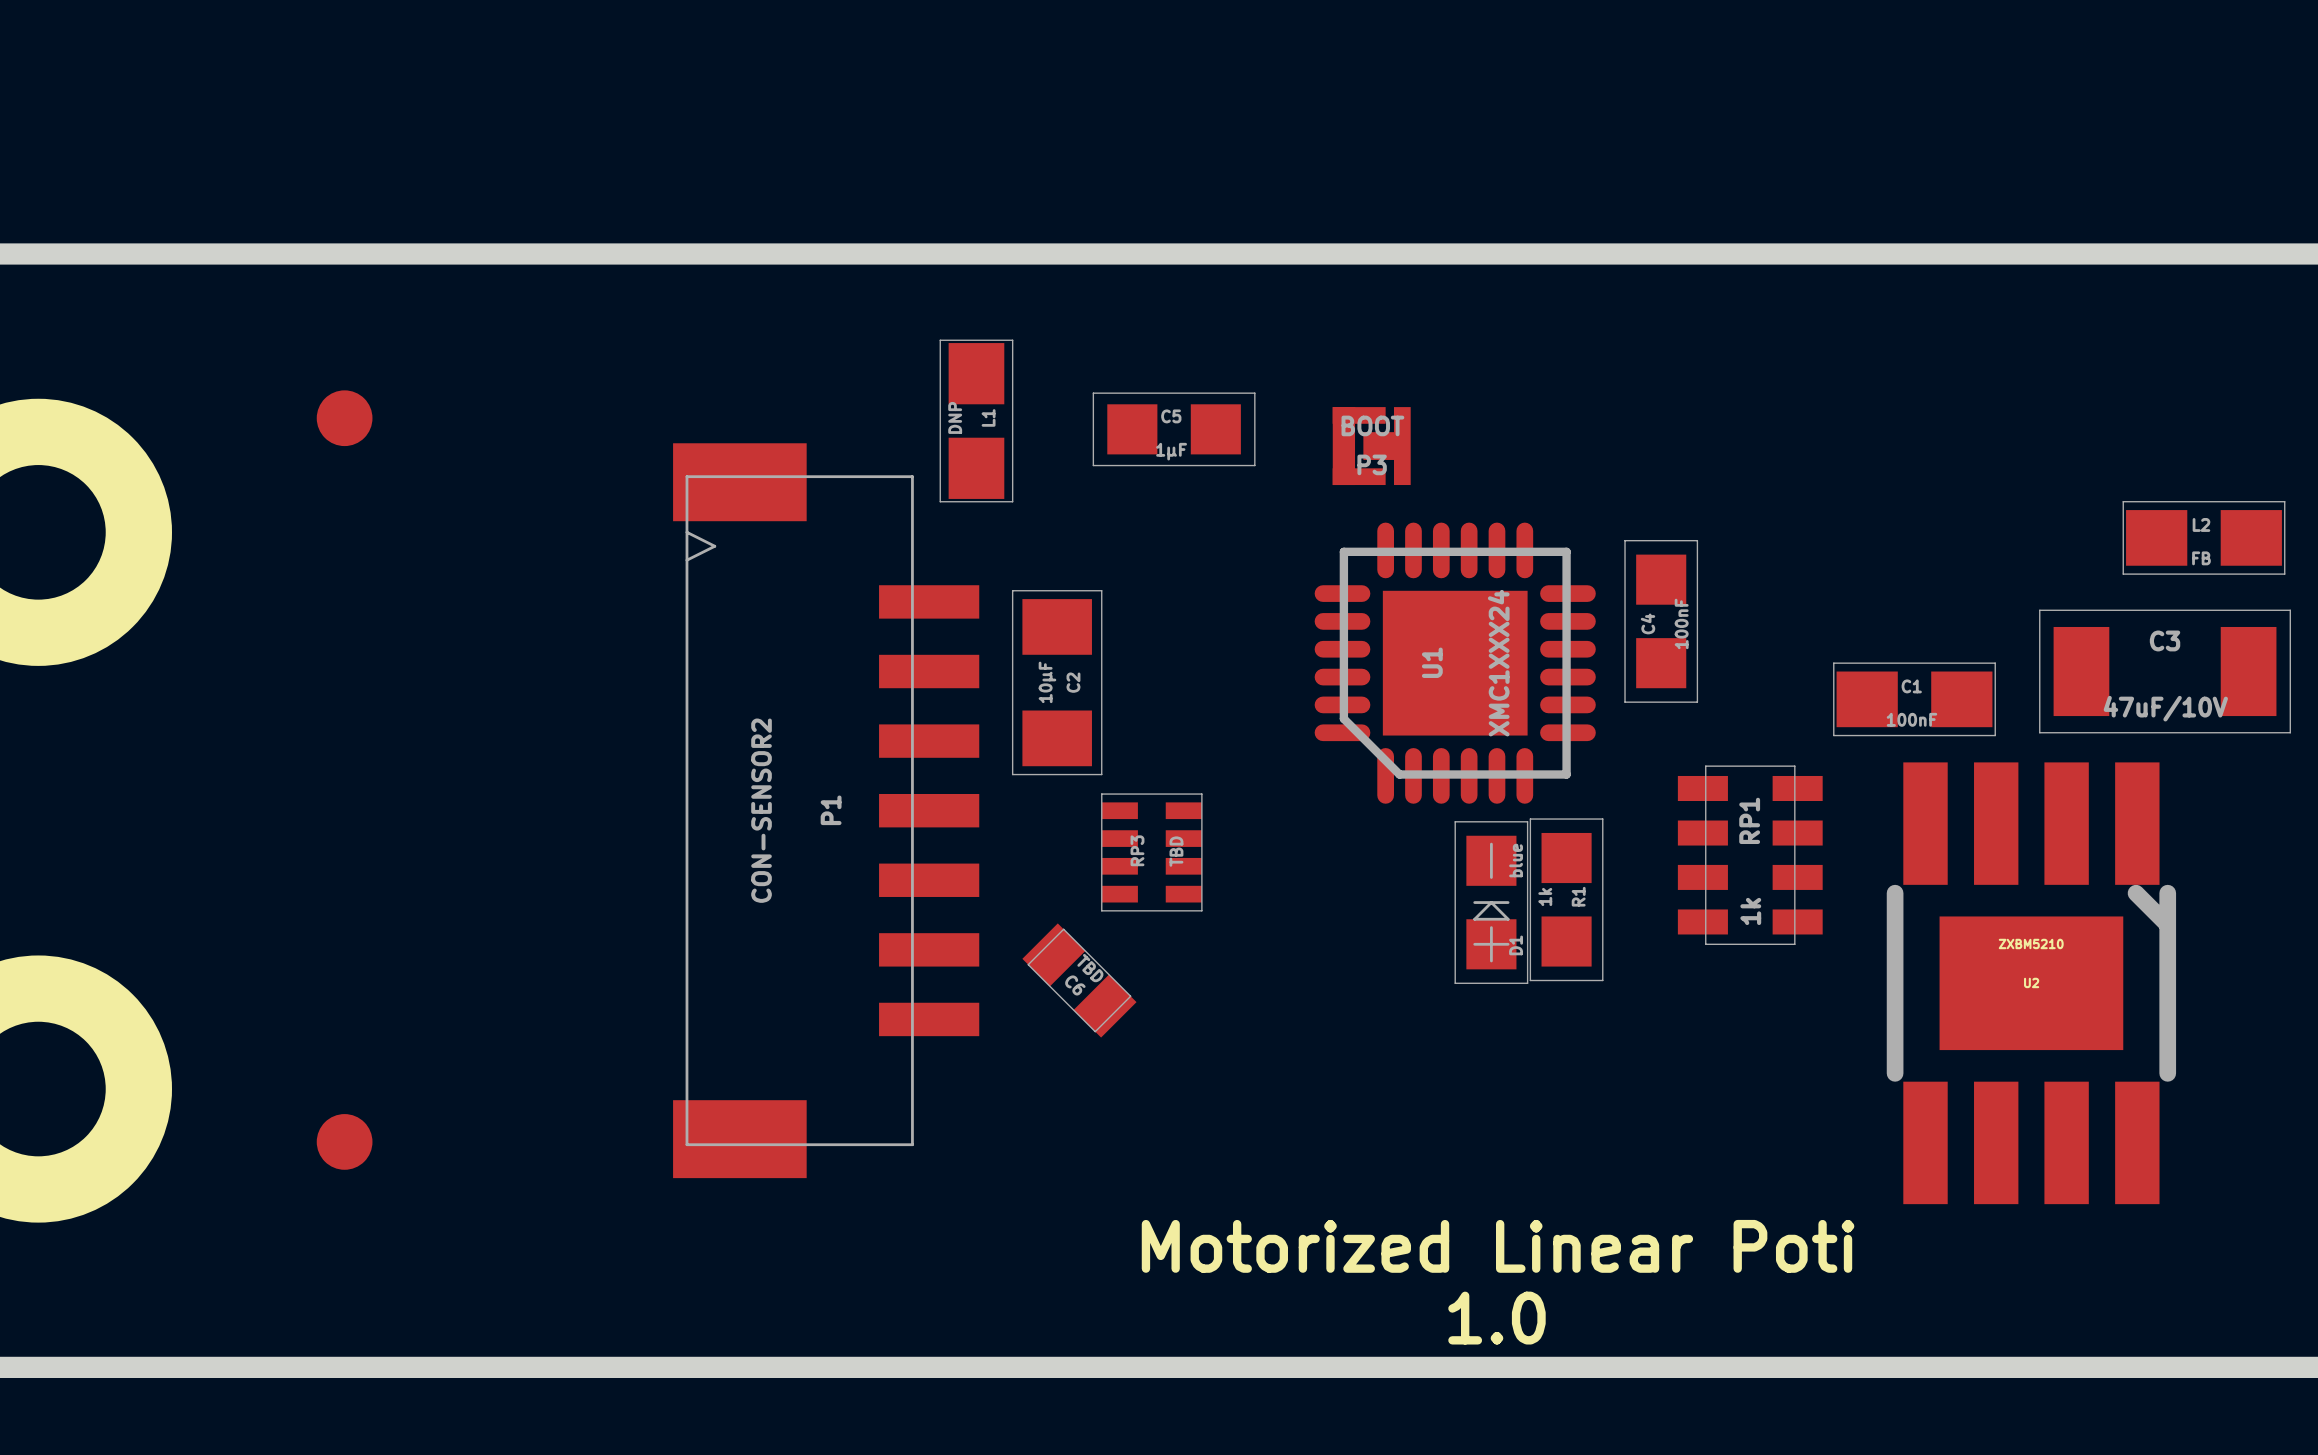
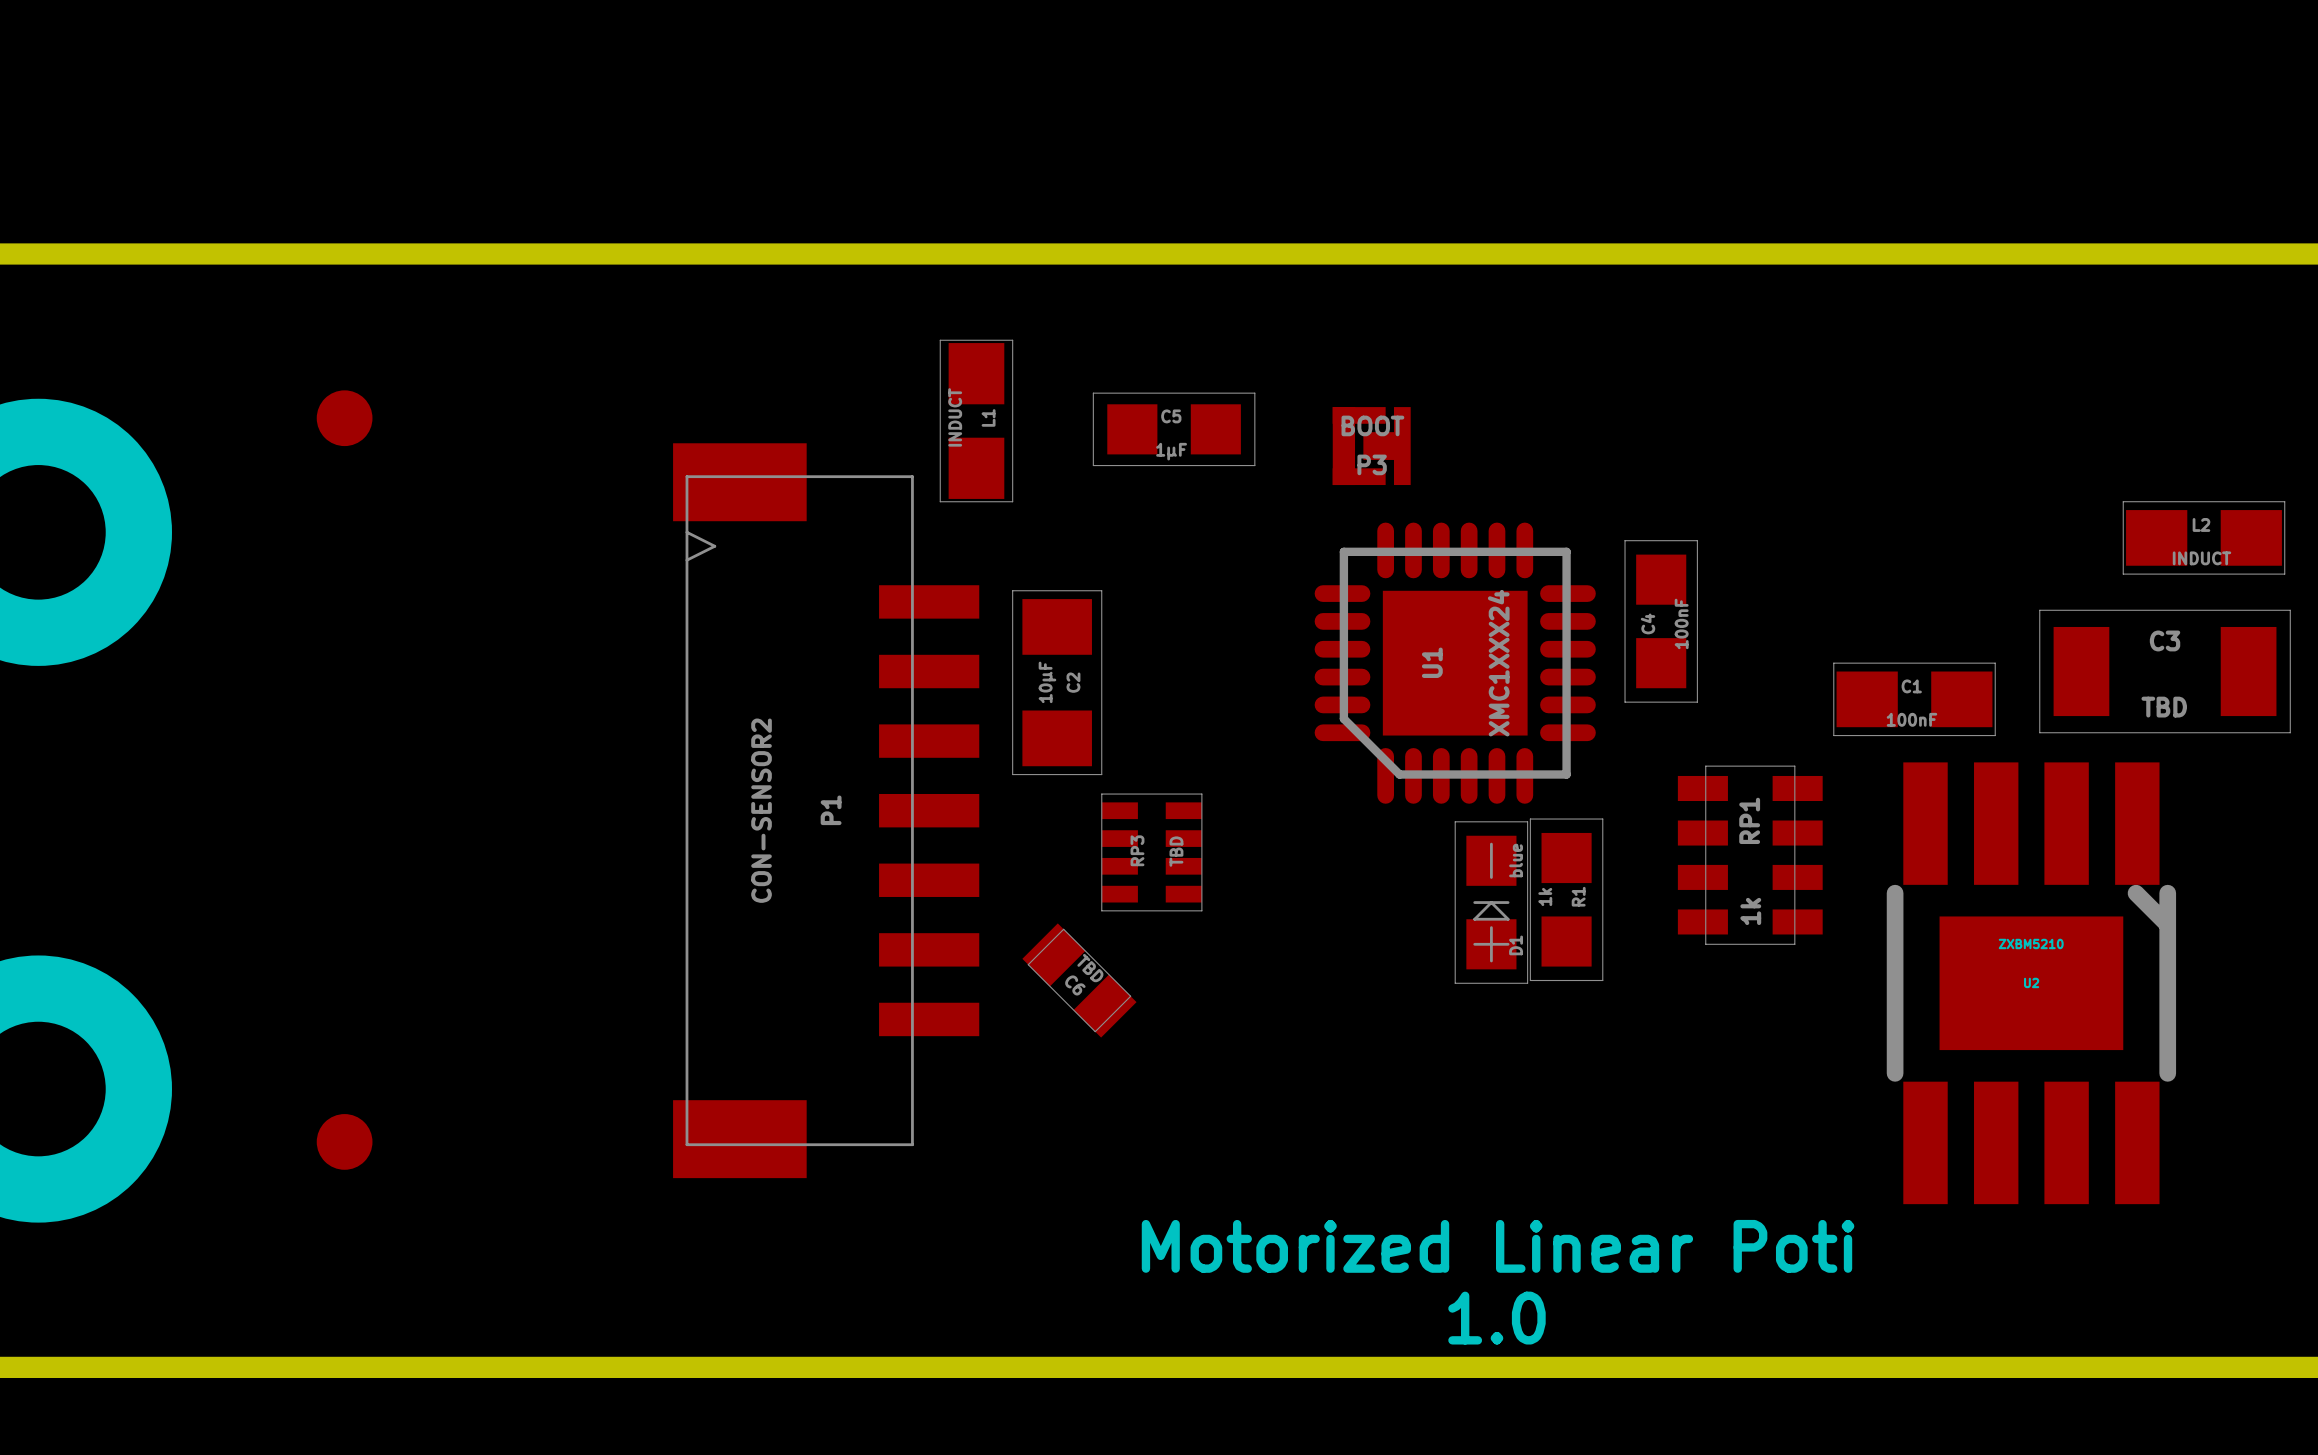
L1 value: DNP (955, 417) -> INDUCT (955, 417)
L2 value: FB (2201, 558) -> INDUCT (2202, 558)
C3 value: 47uF/10V (2165, 708) -> TBD (2164, 707)

